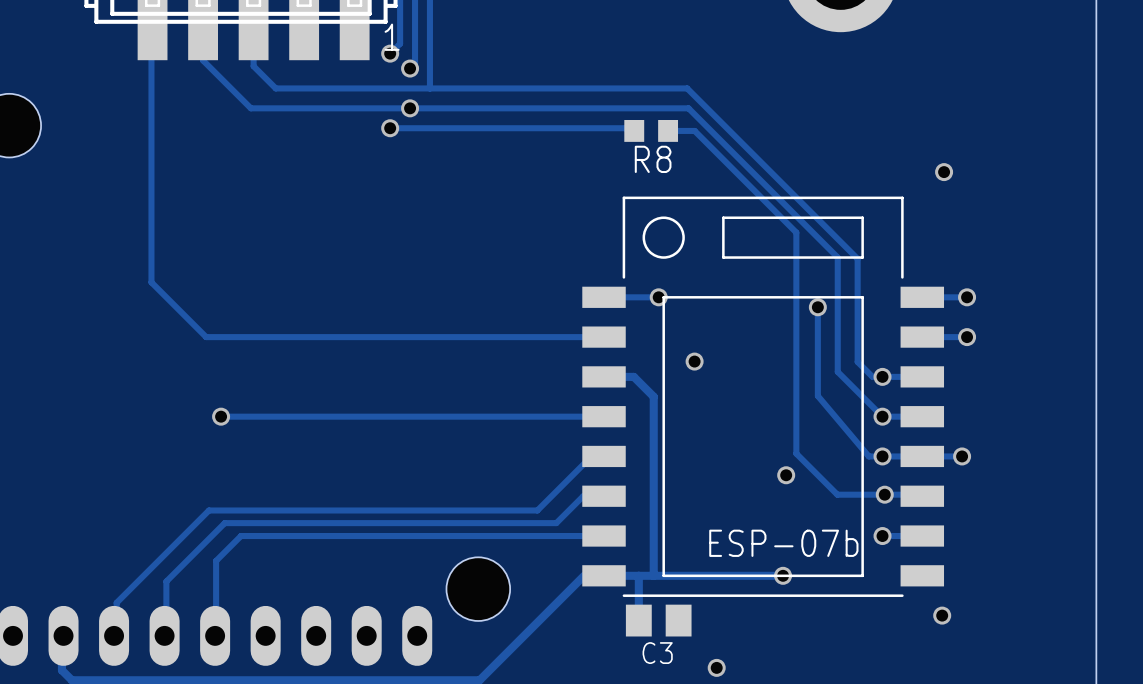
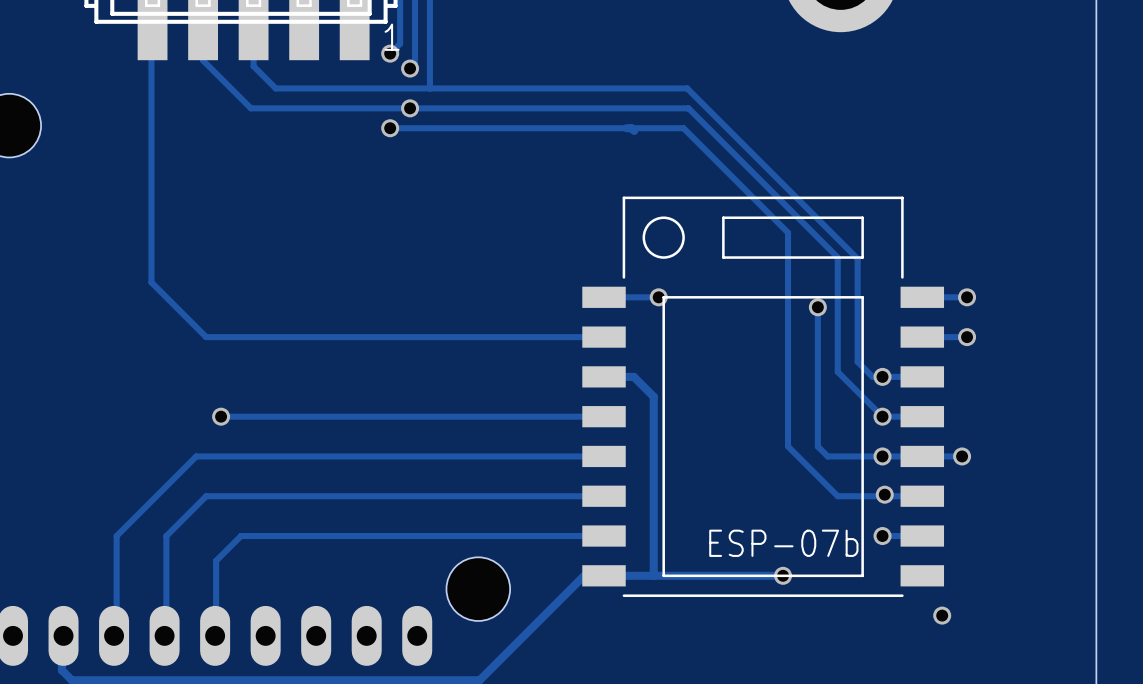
R8: (651, 130) -> none
track: (668, 130) (694, 130) (796, 232) (796, 453) (837, 494) (920, 494) (922, 496) -> (631, 128) (683, 128) (788, 232) (788, 446) (837, 496) (922, 496)
via: (944, 172) -> none
via: (694, 361) -> none
track: (817, 395) (868, 456) -> (817, 395) (817, 446) (827, 456) (868, 456)
track: (591, 456) (537, 510) (208, 510) (116, 602) -> (591, 456) (196, 456) (116, 536) (116, 602)
via: (786, 475) -> none
track: (583, 496) (556, 523) (224, 523) (166, 581) -> (583, 496) (206, 496) (166, 536) (166, 581)
track: (638, 575) (638, 620) -> none
C3: (658, 620) -> none
via: (716, 667) -> none

